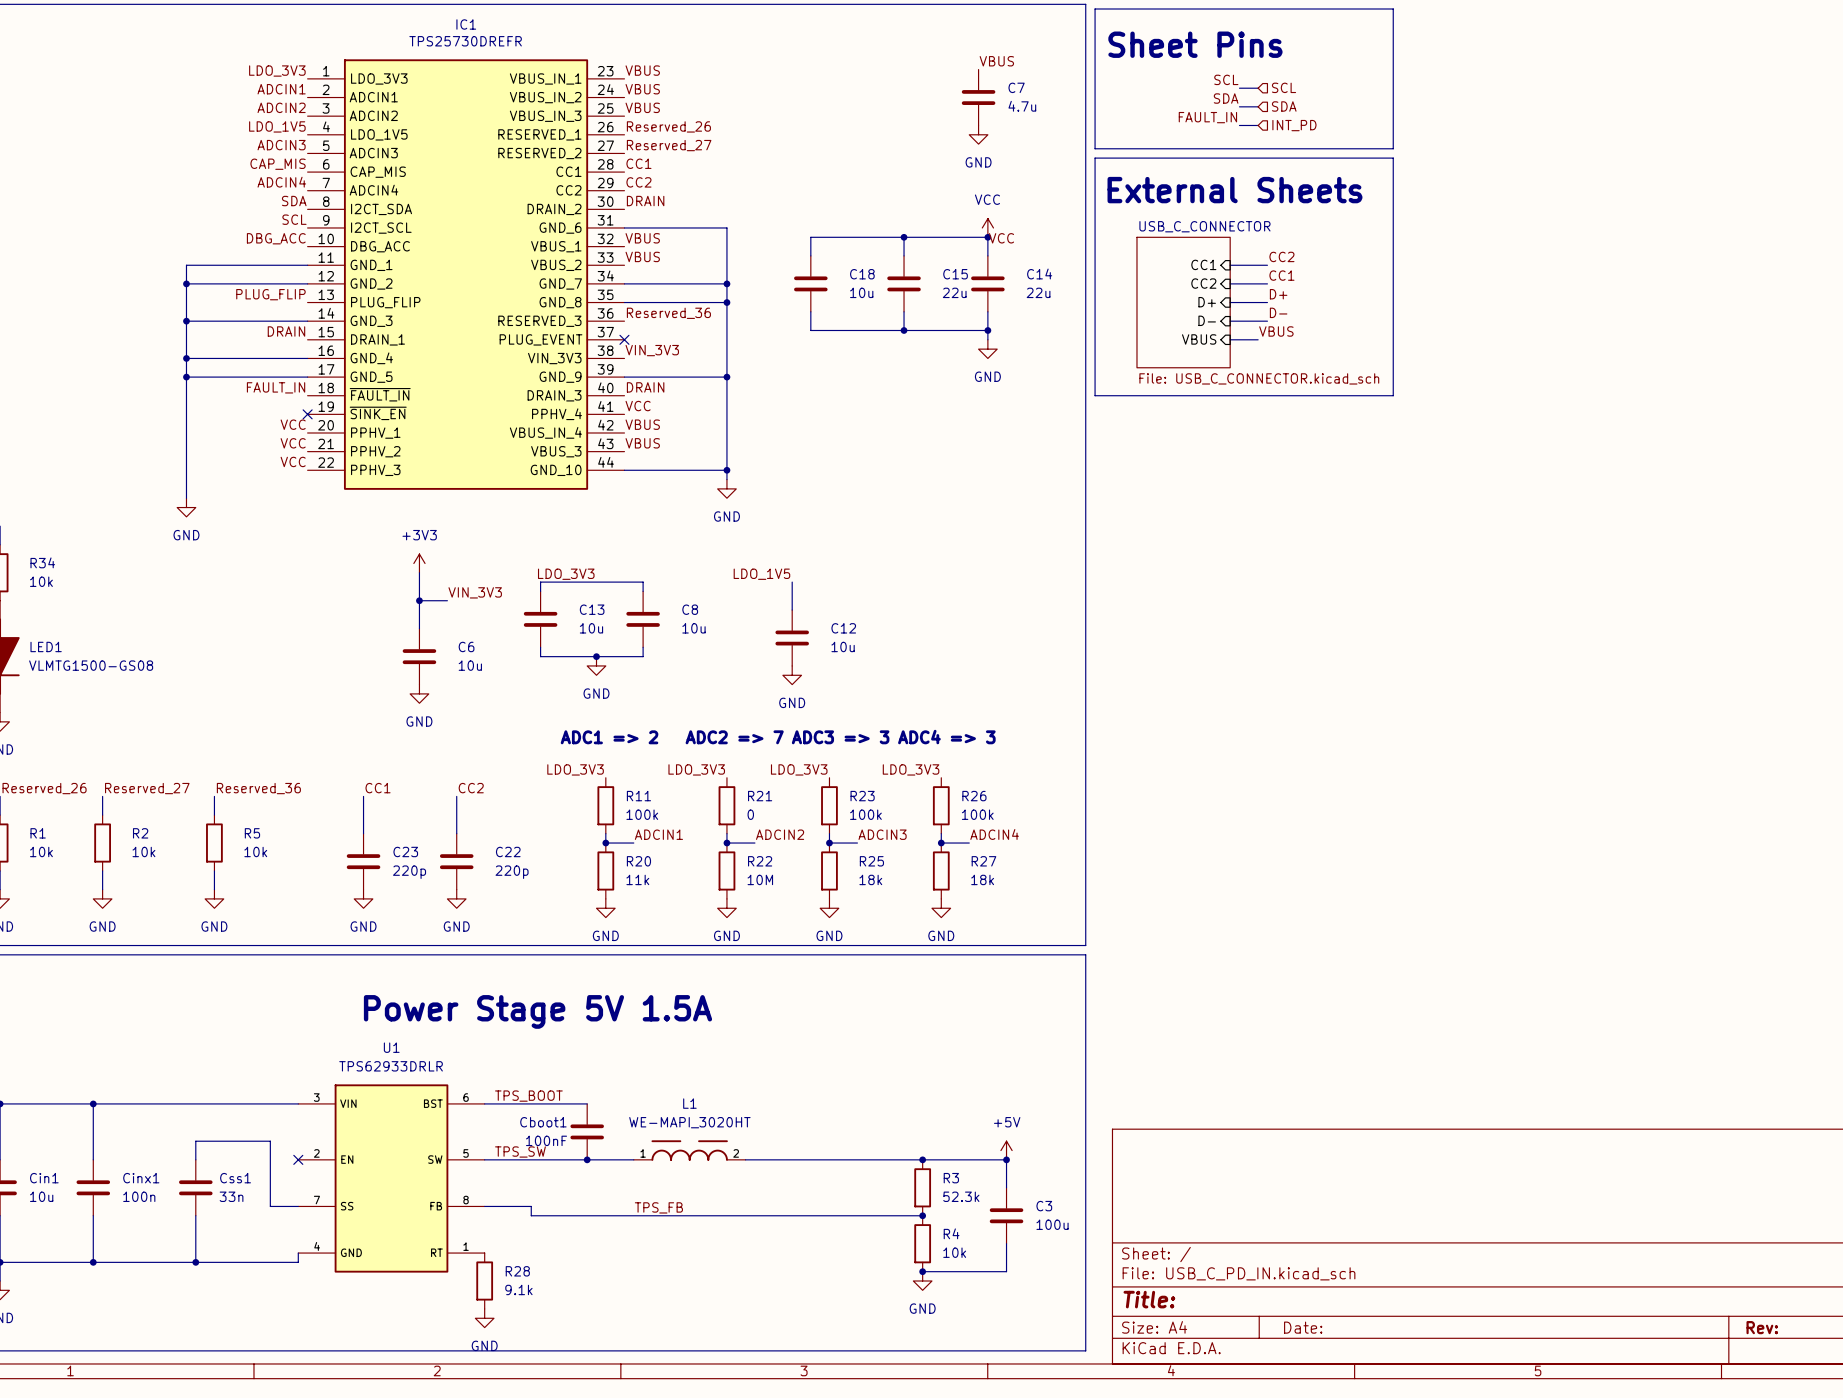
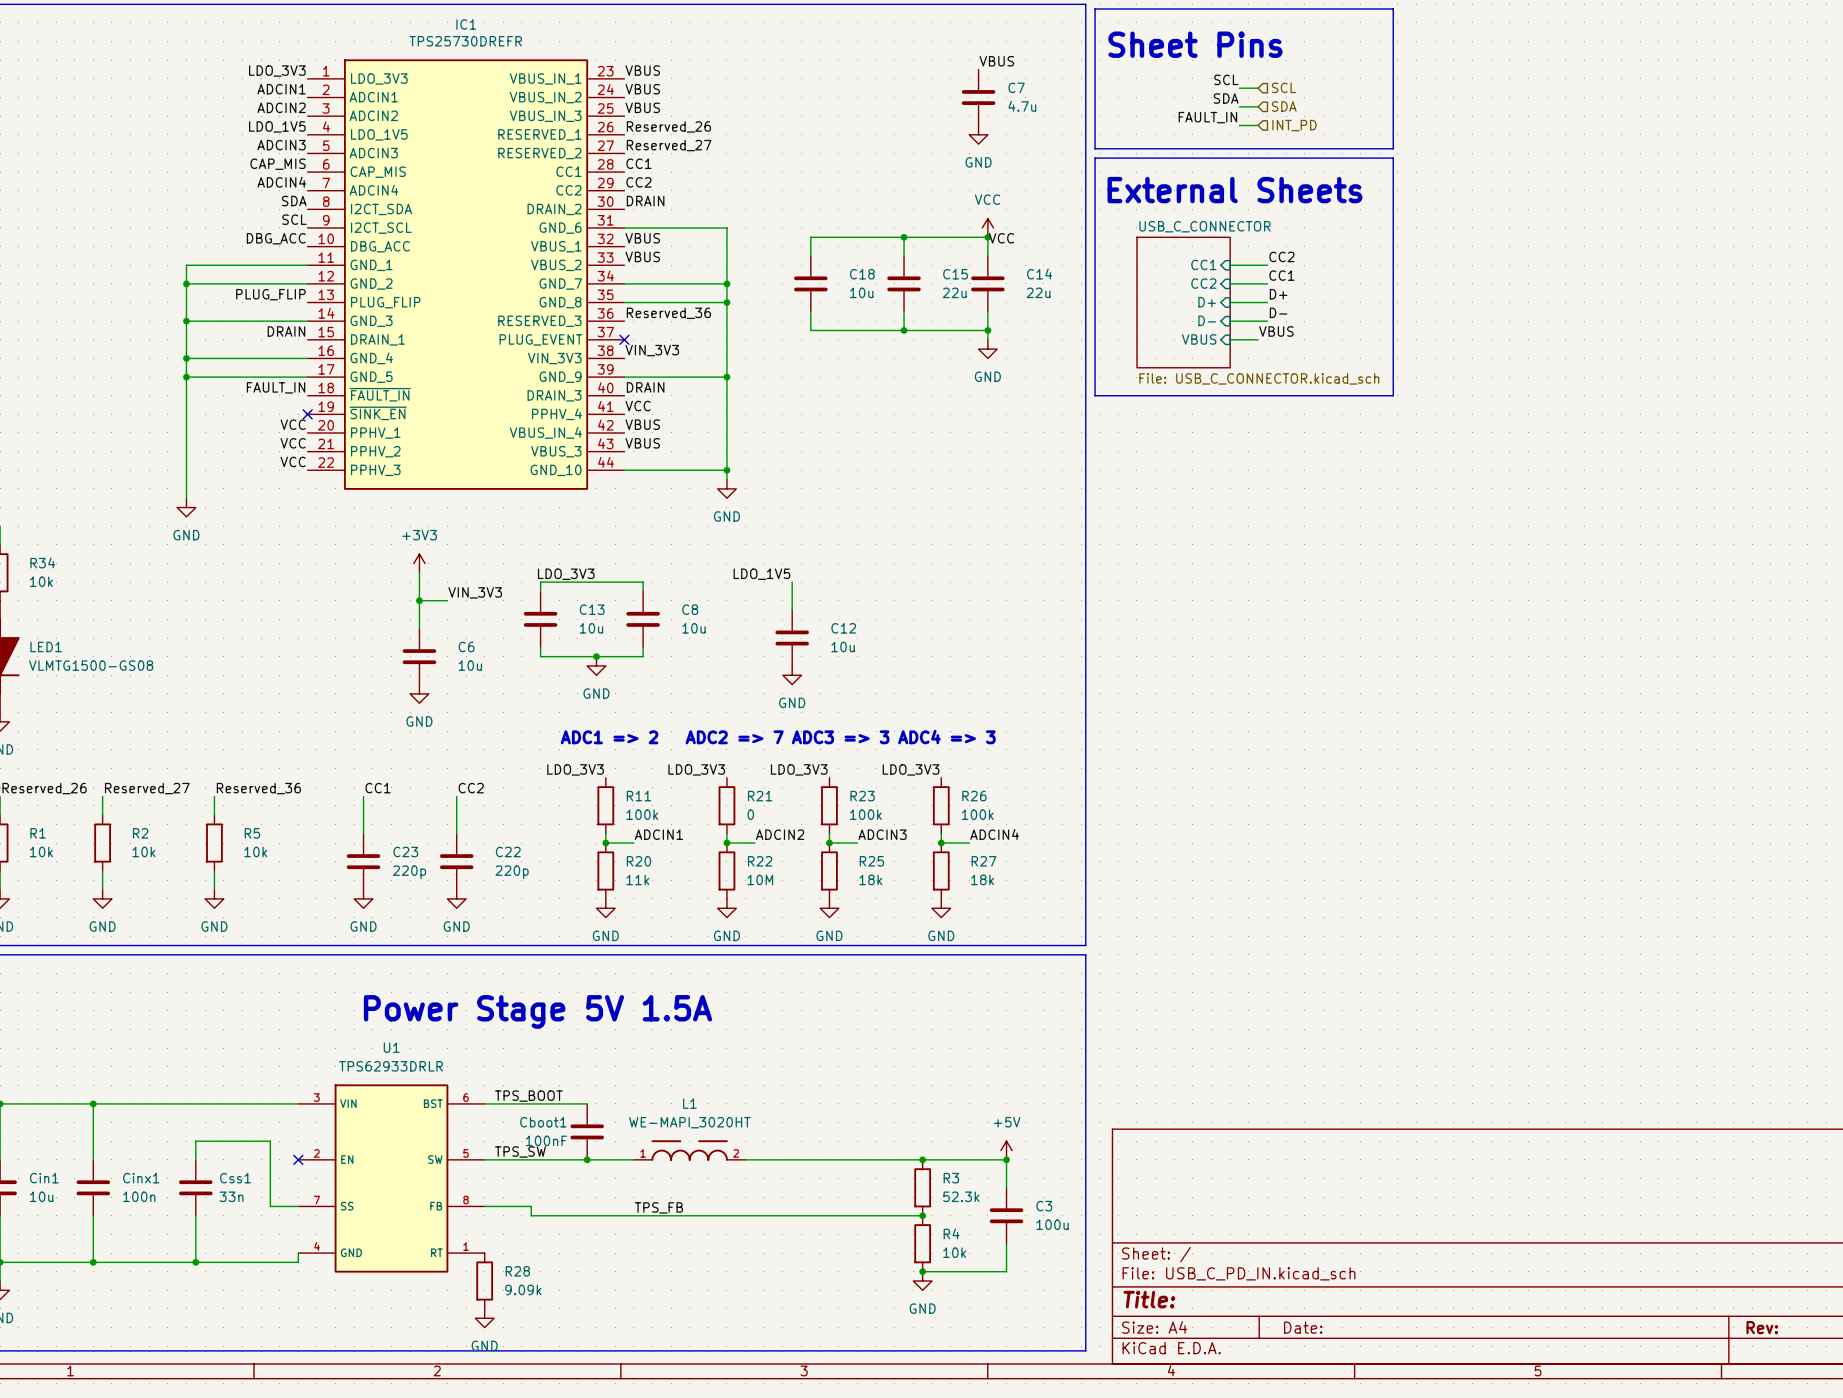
R28 value: 9.1k (518, 1289) -> 9.09k (523, 1289)

